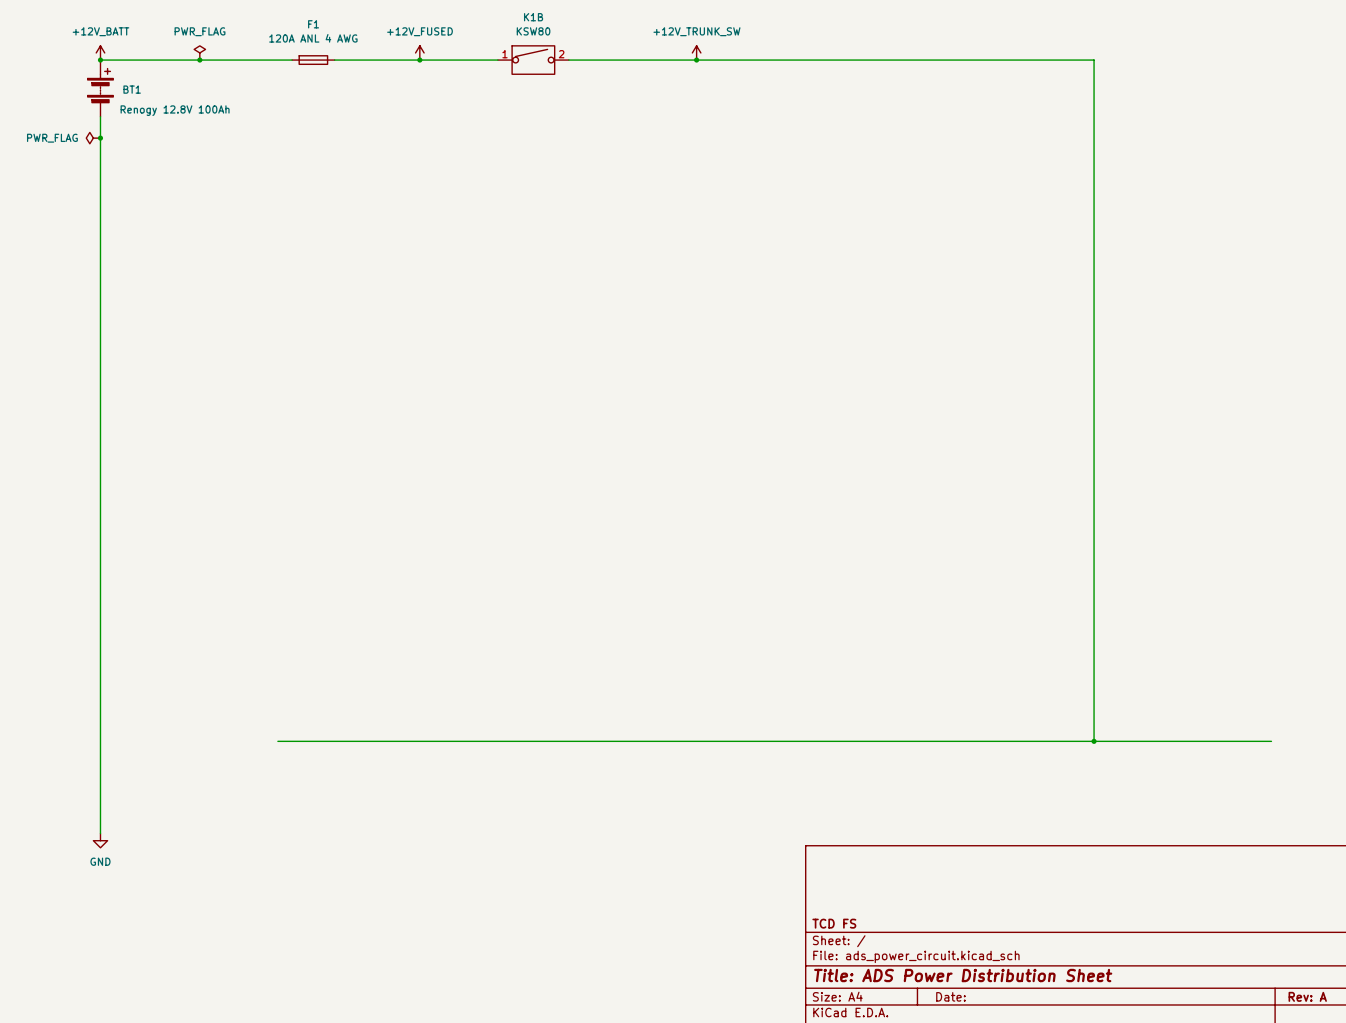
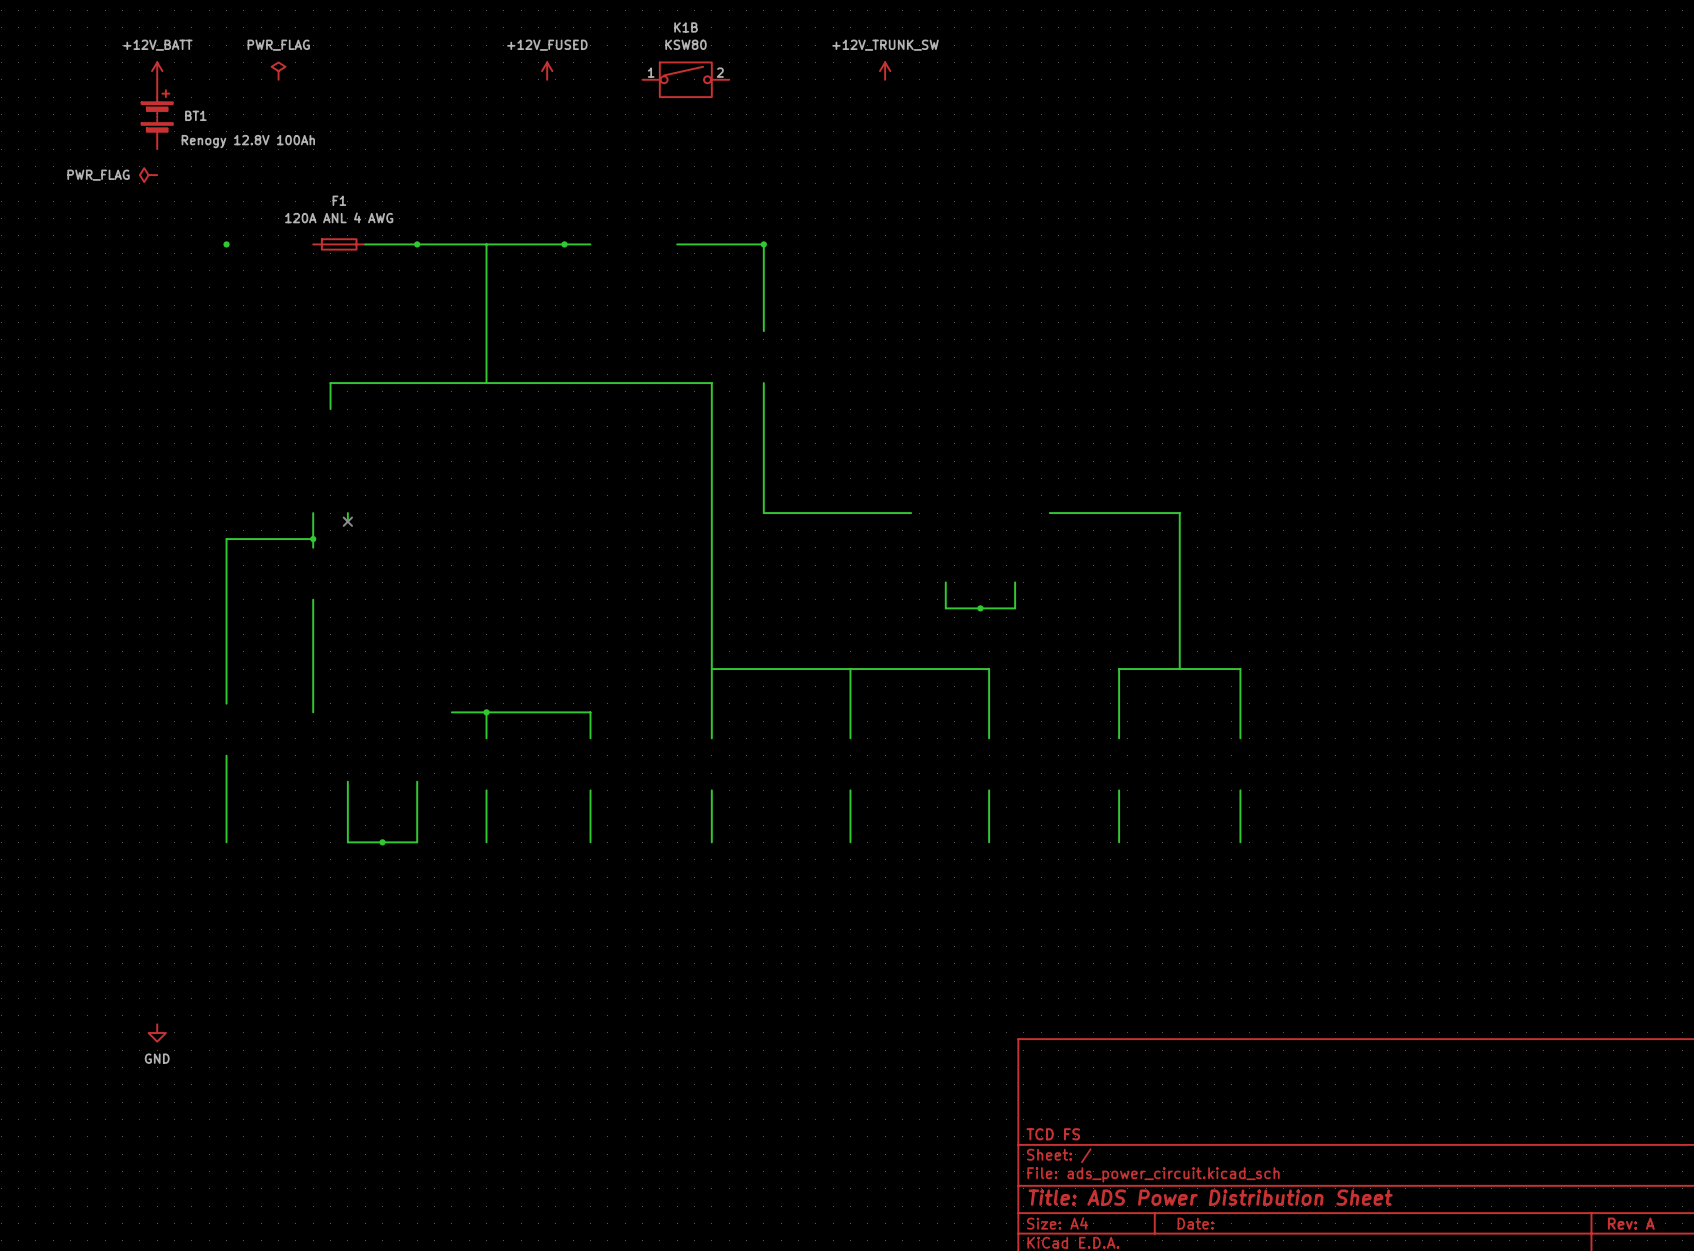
wire: (100, 60) (292, 60) -> none
junction: (100, 60) -> none
junction: (199, 60) -> none
F1 position: (313, 60) -> (339, 244)
wire: (334, 60) (497, 60) -> none
junction: (419, 60) -> none
wire: (568, 60) (1094, 60) (1094, 741) -> none
junction: (696, 60) -> none
wire: (100, 116) (100, 833) -> none
junction: (100, 138) -> none
junction: none -> (226, 244)
wire: none -> (365, 244) (590, 244)
junction: none -> (417, 244)
wire: none -> (486, 244) (486, 383)
junction: none -> (564, 244)
wire: none -> (677, 244) (763, 244) (763, 331)
junction: none -> (763, 244)
wire: none -> (763, 383) (763, 513) (911, 513)
wire: none -> (330, 409) (330, 383) (711, 383) (711, 738)
wire: none -> (313, 513) (313, 547)
wire: none -> (347, 513) (347, 521)
wire: none -> (1049, 513) (1179, 513) (1179, 669)
no-connect mark: none -> (347, 521)
wire: none -> (313, 539) (226, 539) (226, 703)
junction: none -> (313, 539)
wire: none -> (945, 582) (945, 608) (1015, 608) (1015, 582)
wire: none -> (313, 599) (313, 712)
junction: none -> (980, 608)
wire: none -> (711, 669) (989, 669) (989, 738)
wire: none -> (850, 669) (850, 738)
wire: none -> (451, 712) (590, 712) (590, 738)
wire: none -> (486, 712) (486, 738)
junction: none -> (486, 712)
wire: none -> (1119, 738) (1119, 669) (1240, 669) (1240, 738)
wire: none -> (226, 755) (226, 842)
wire: none -> (347, 781) (347, 842) (417, 842) (417, 781)
wire: none -> (486, 790) (486, 842)
wire: none -> (590, 790) (590, 842)
wire: none -> (711, 790) (711, 842)
wire: none -> (850, 790) (850, 842)
wire: none -> (989, 790) (989, 842)
wire: none -> (1119, 790) (1119, 842)
wire: none -> (1240, 790) (1240, 842)
junction: none -> (382, 842)
wire: (277, 741) (1271, 741) -> none
junction: (1094, 741) -> none

